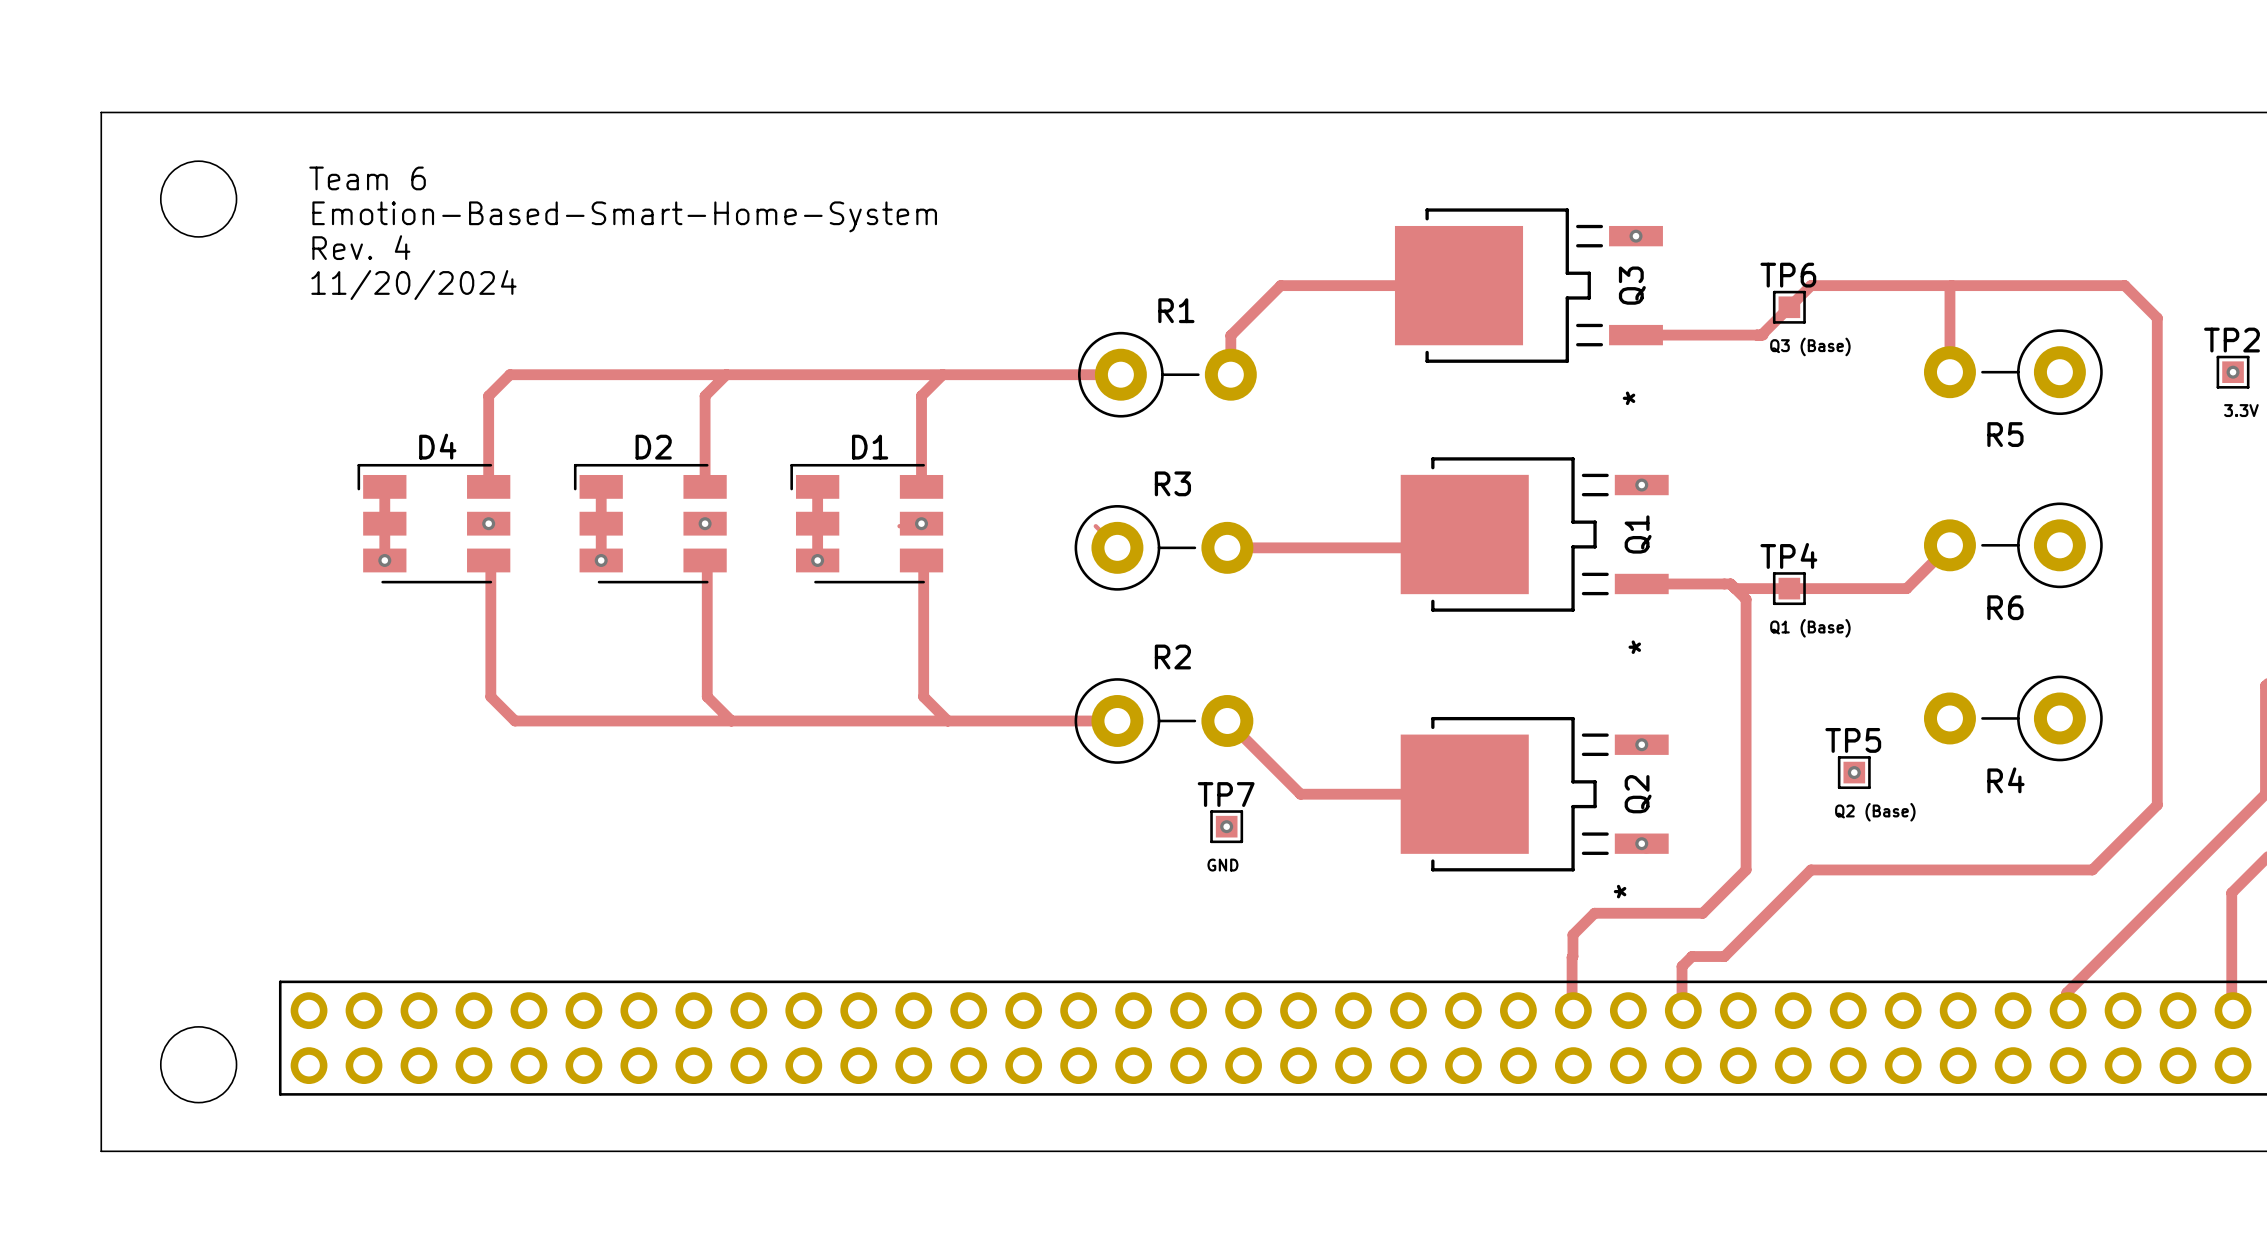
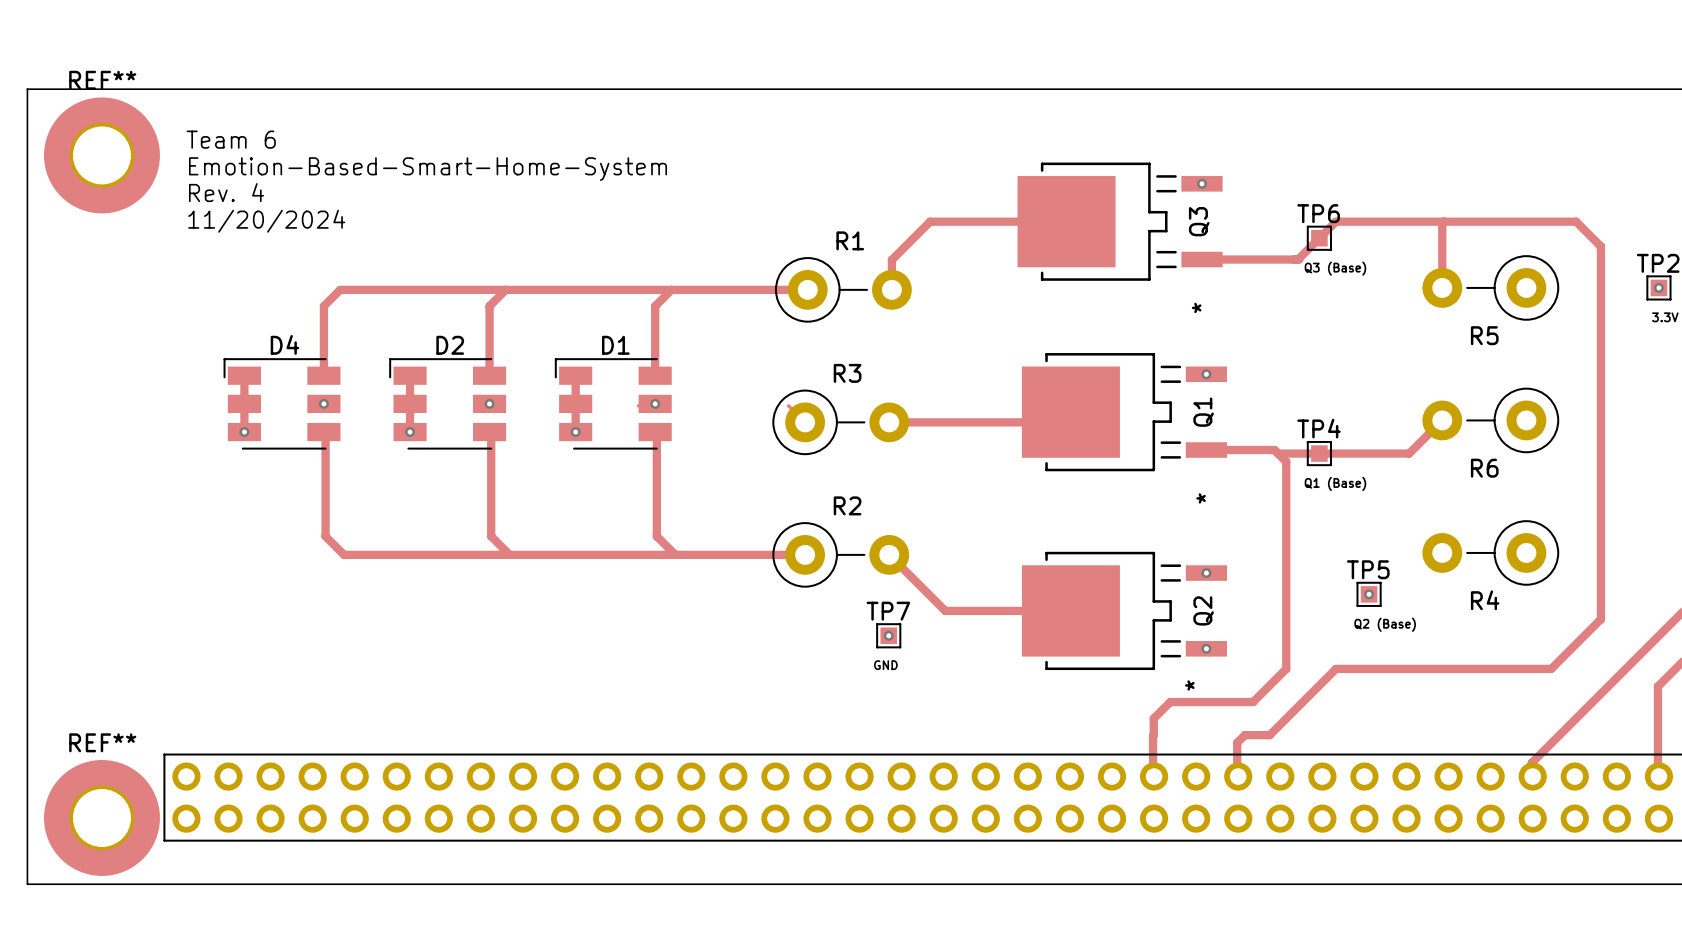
round board edge: [160, 160, 238, 238] -> none
REF**: none -> (101, 155)
round board edge: [160, 1026, 238, 1104] -> none
REF**: none -> (101, 817)

